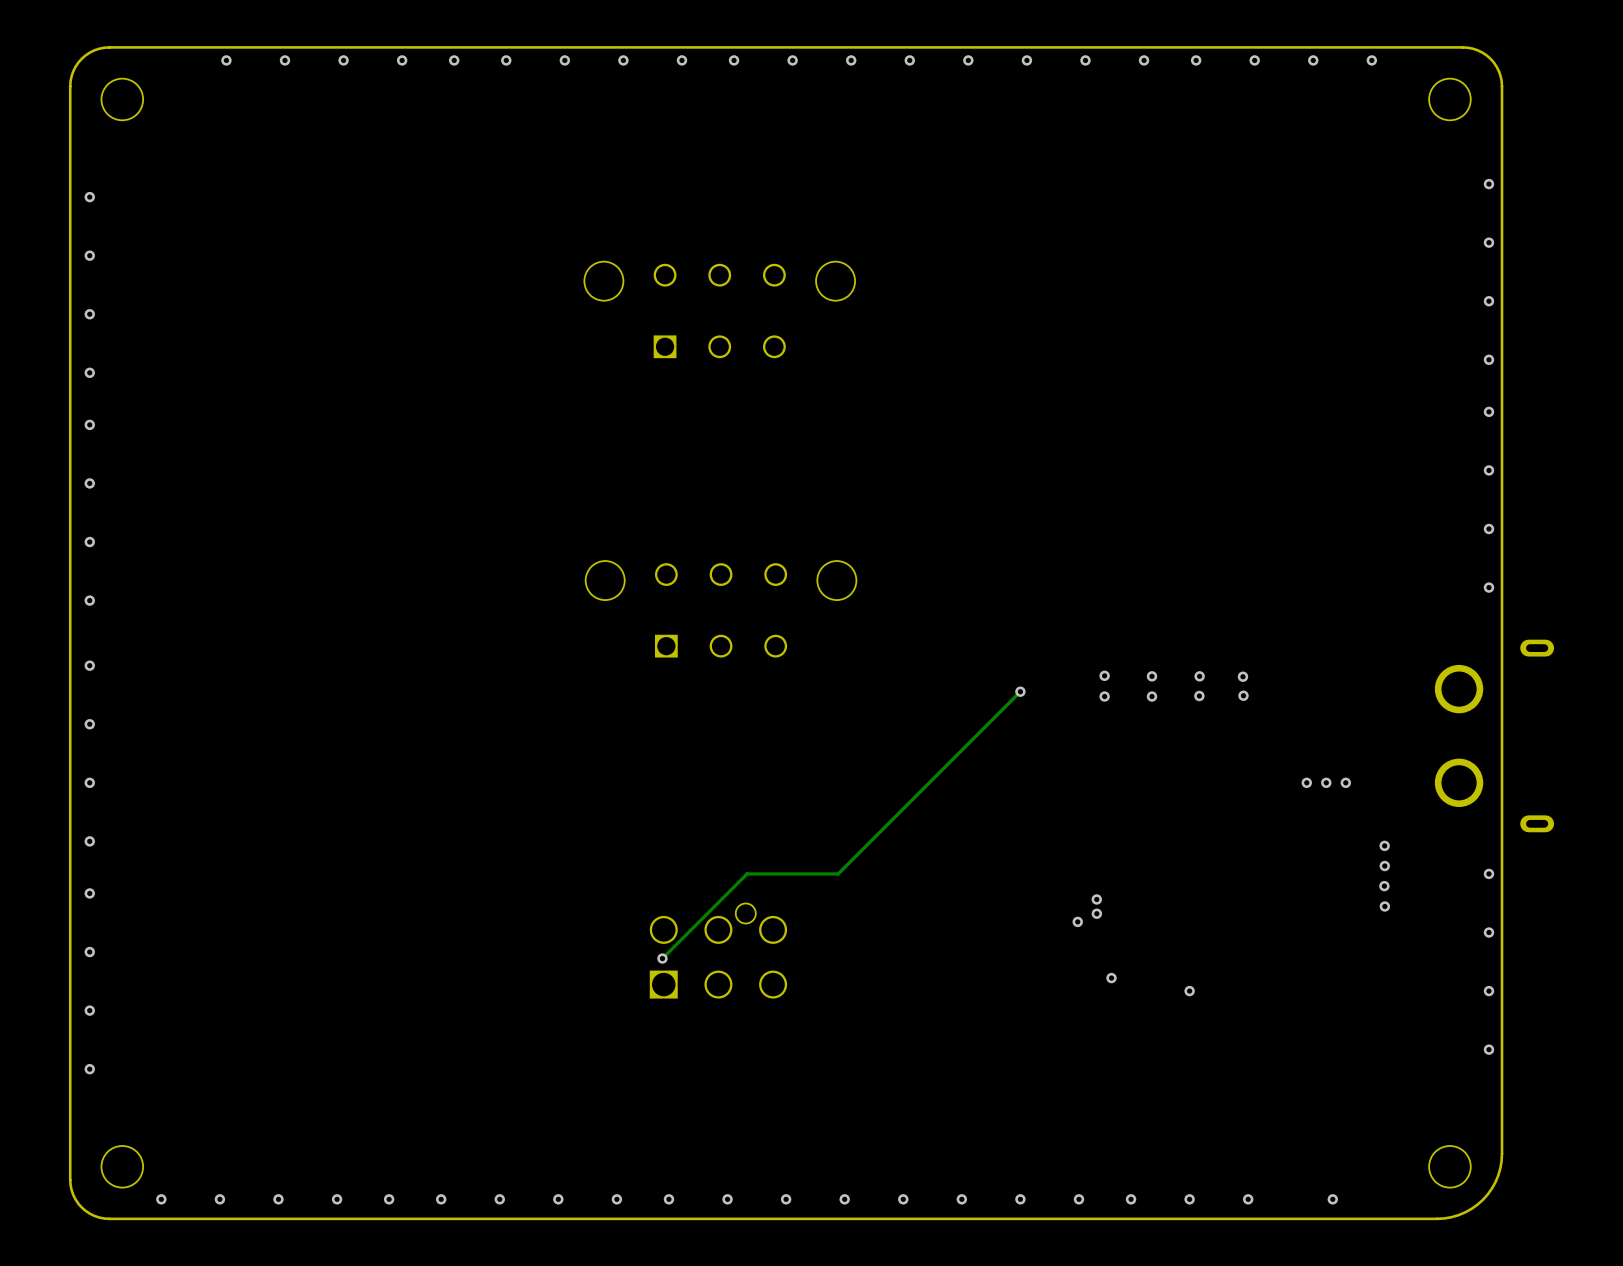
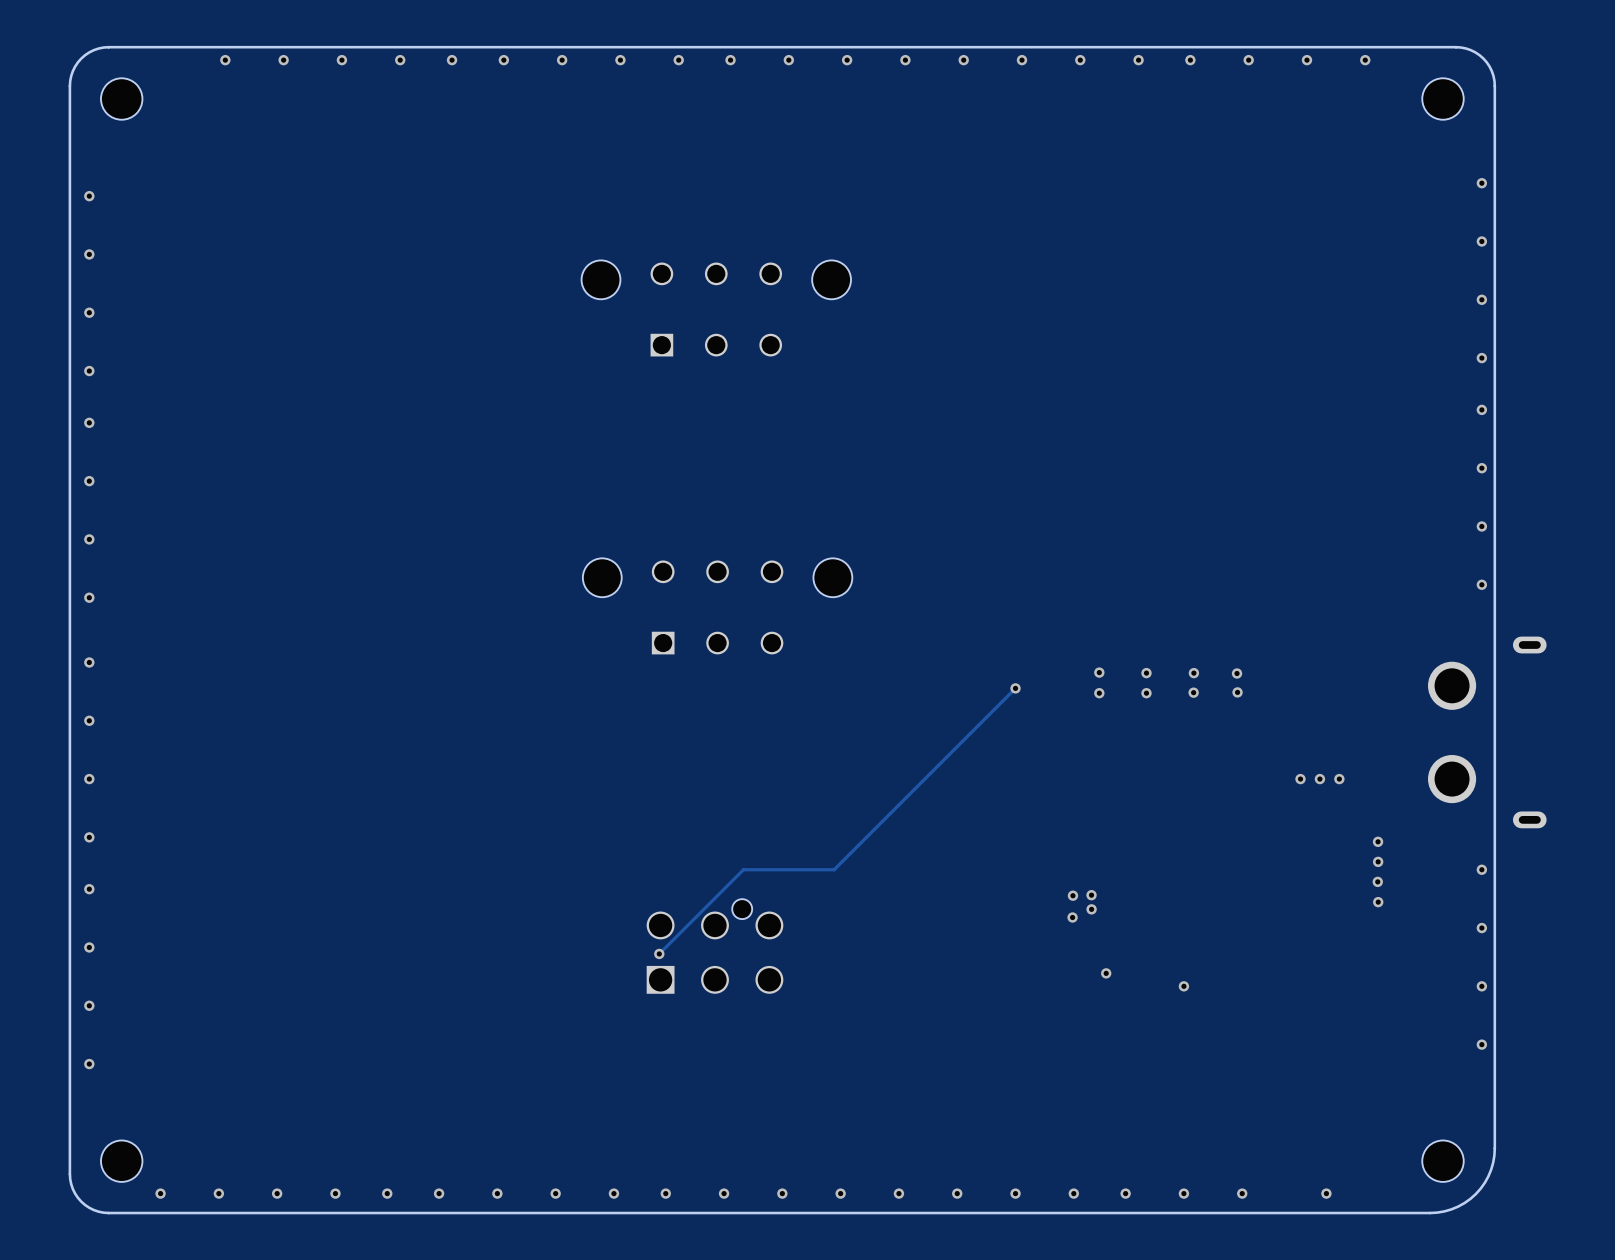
via: none -> (1072, 895)

